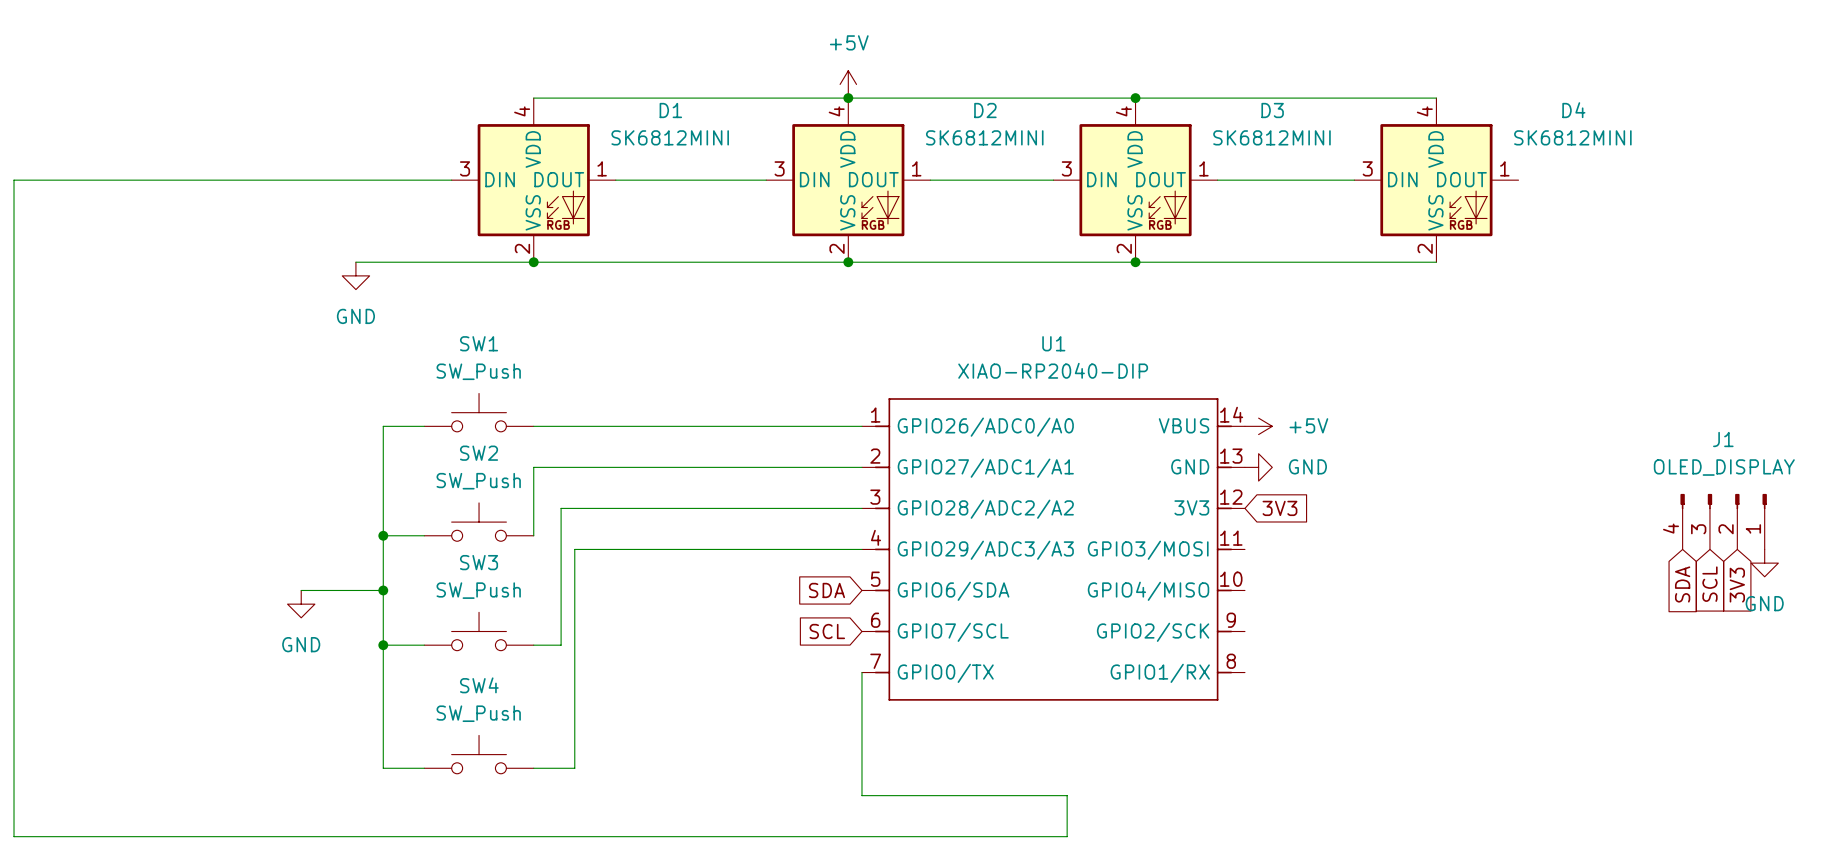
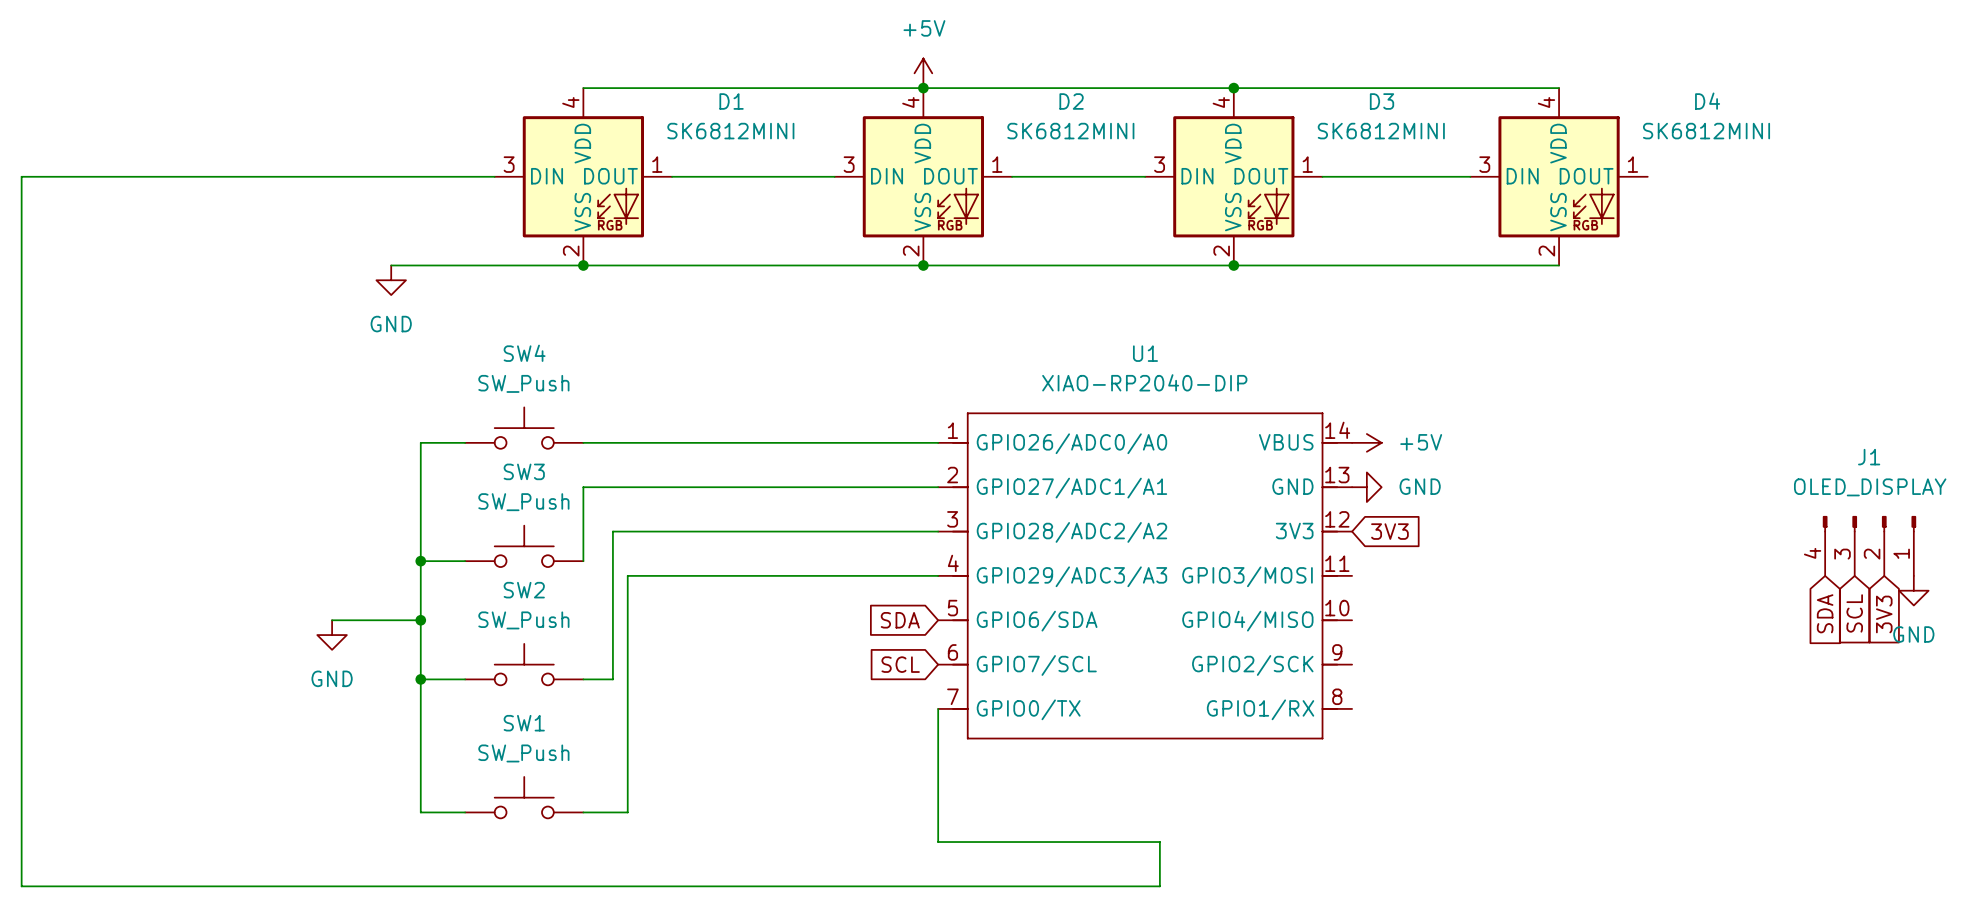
SW1 name: SW1 (479, 343) -> SW4 (524, 353)
SW2 name: SW2 (479, 453) -> SW3 (524, 471)
SW3 name: SW3 (479, 562) -> SW2 (524, 590)
SW4 name: SW4 (479, 685) -> SW1 (524, 723)

